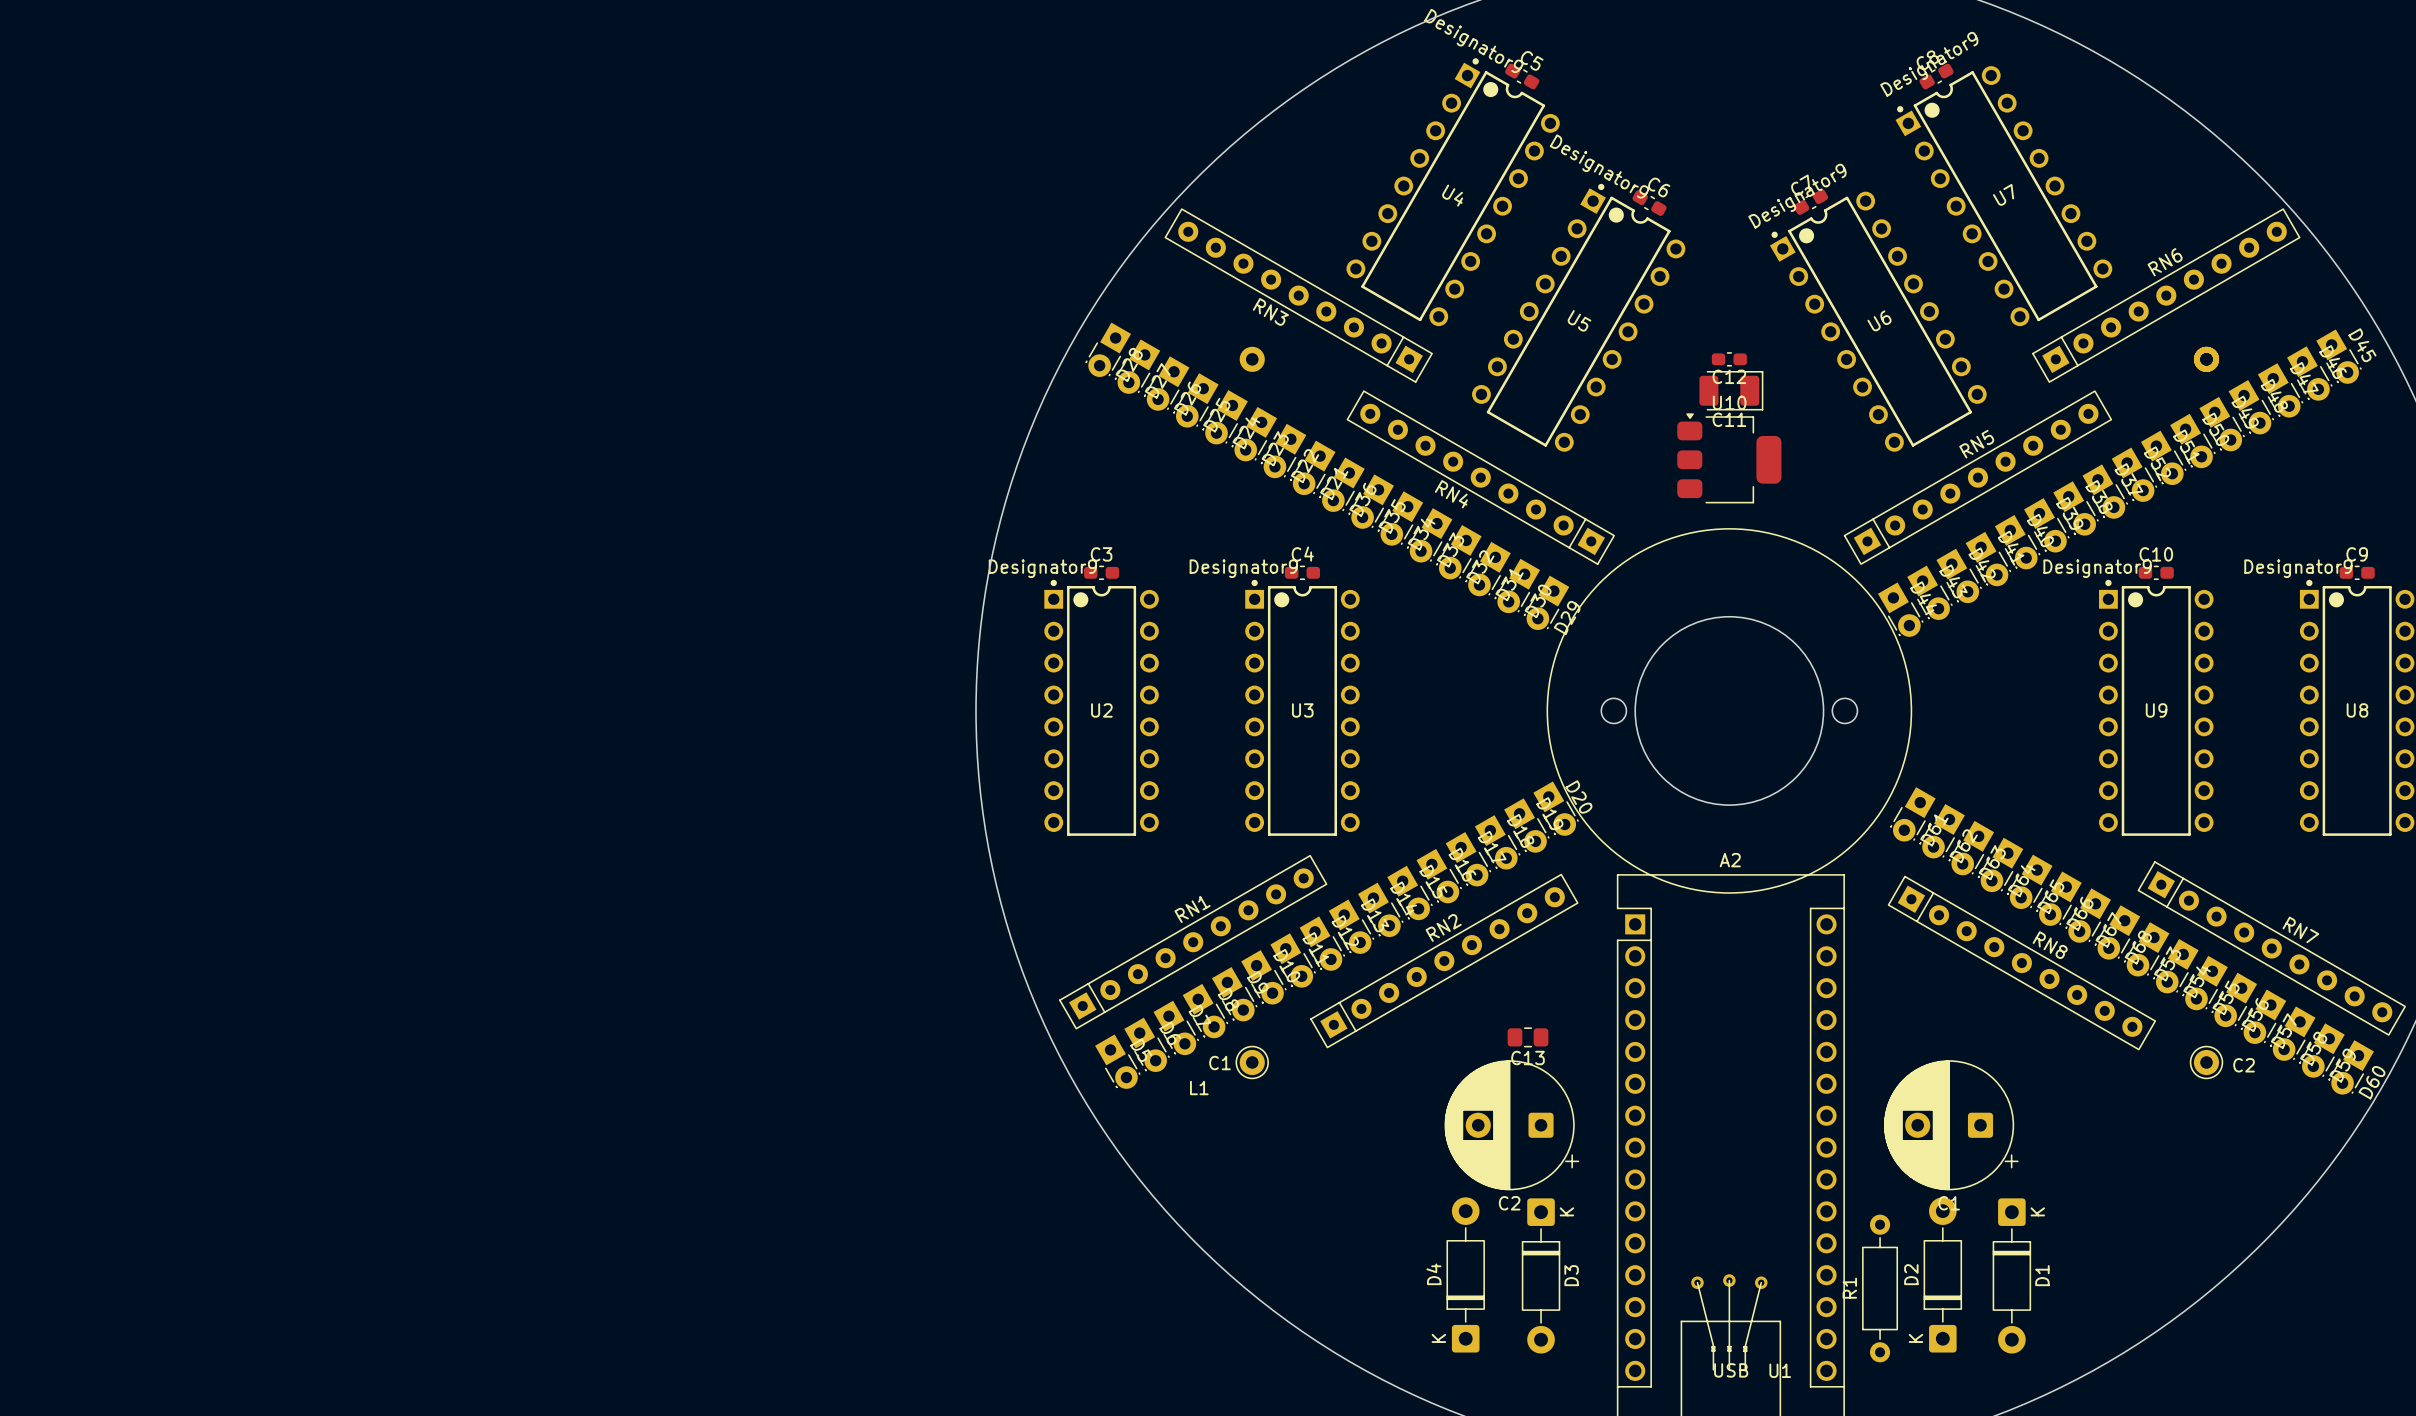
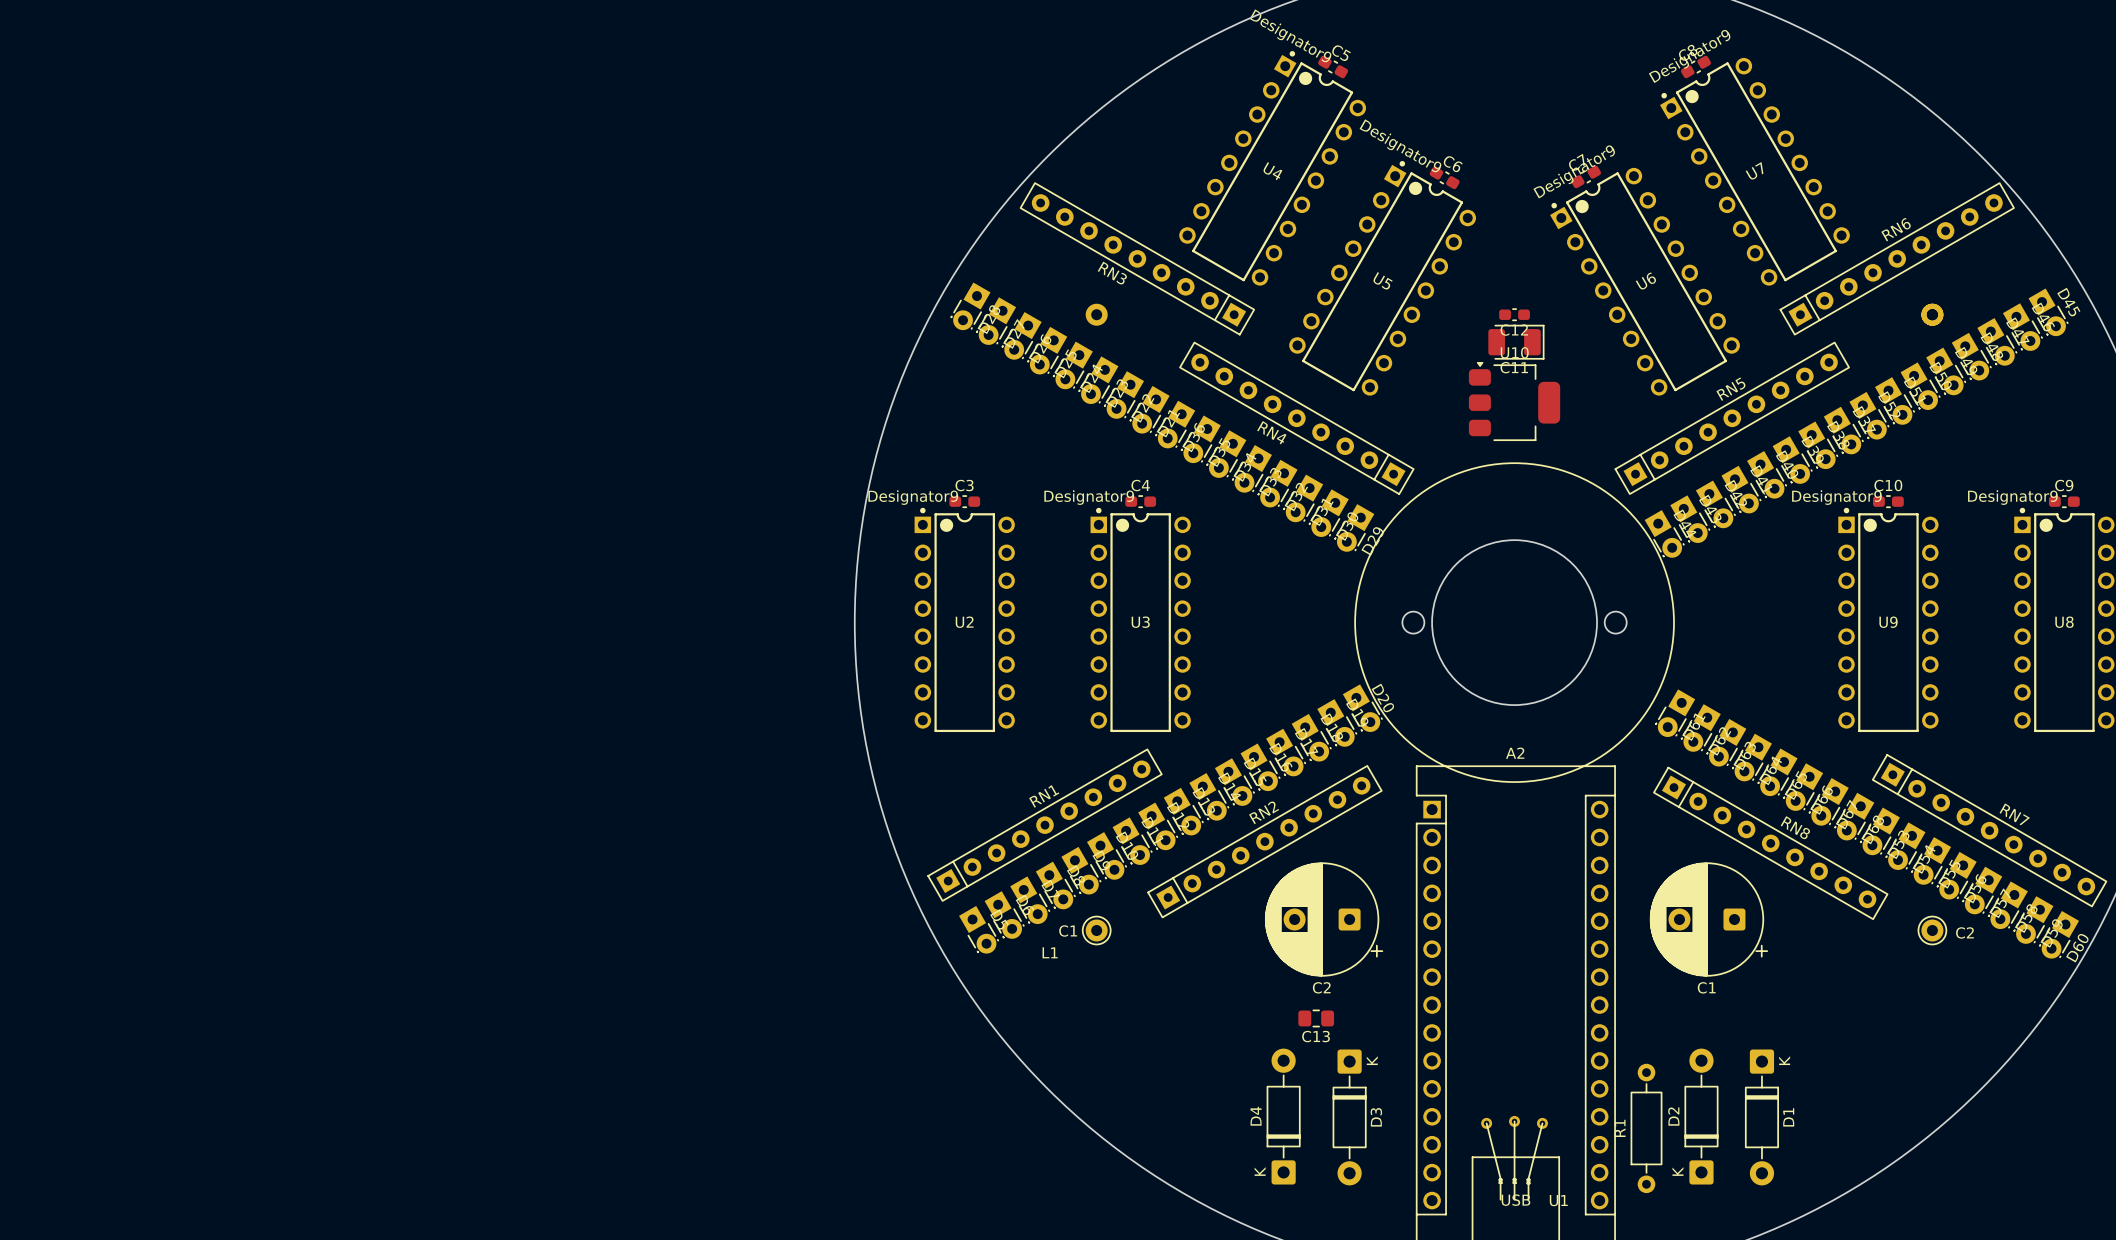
C13 position: (1528, 1037) -> (1316, 1018)
C2 position: (1511, 1125) -> (1324, 919)
C1 position: (1951, 1125) -> (1708, 919)

